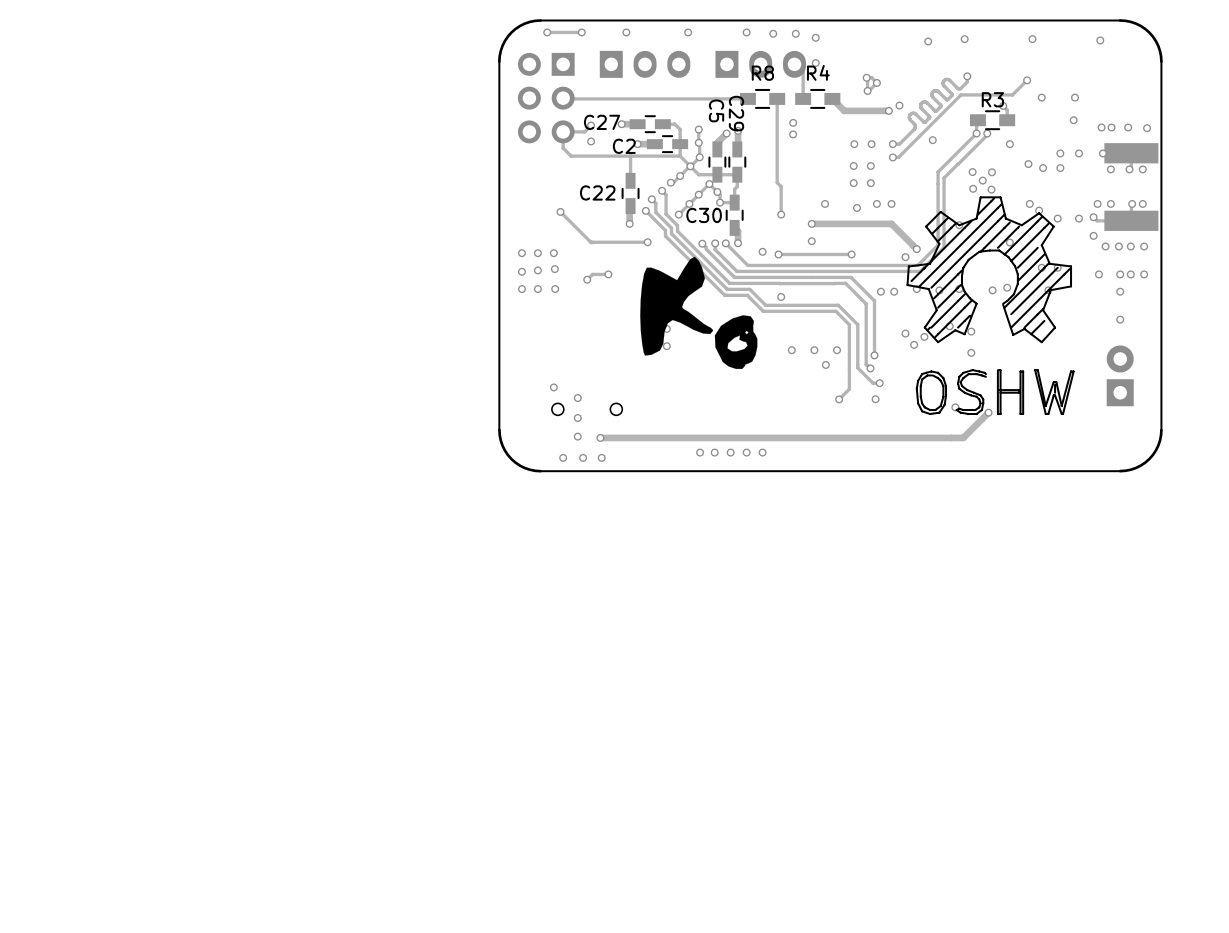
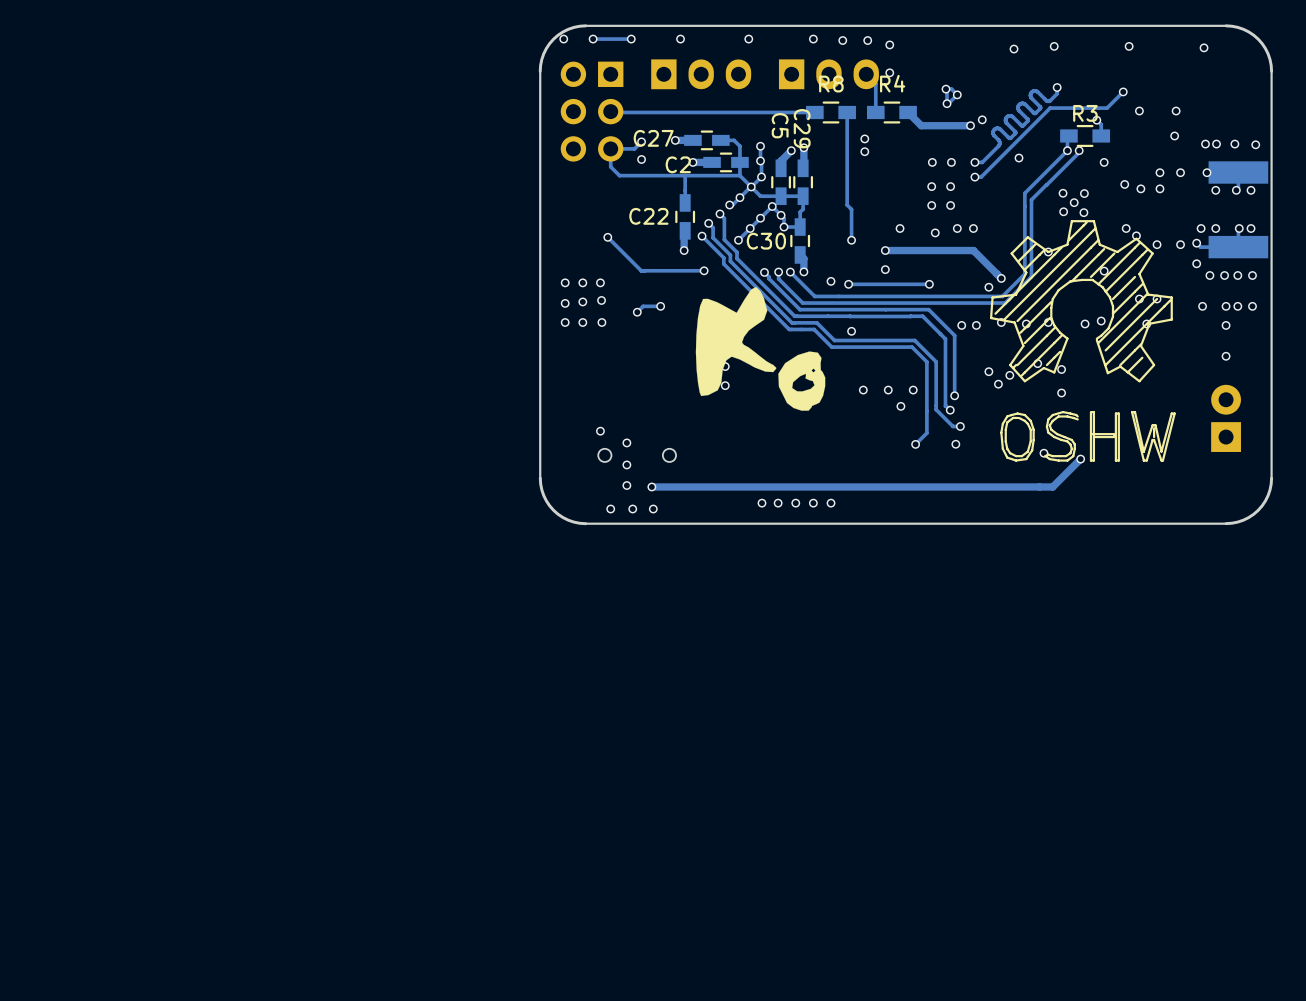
via: none -> (563, 39)

